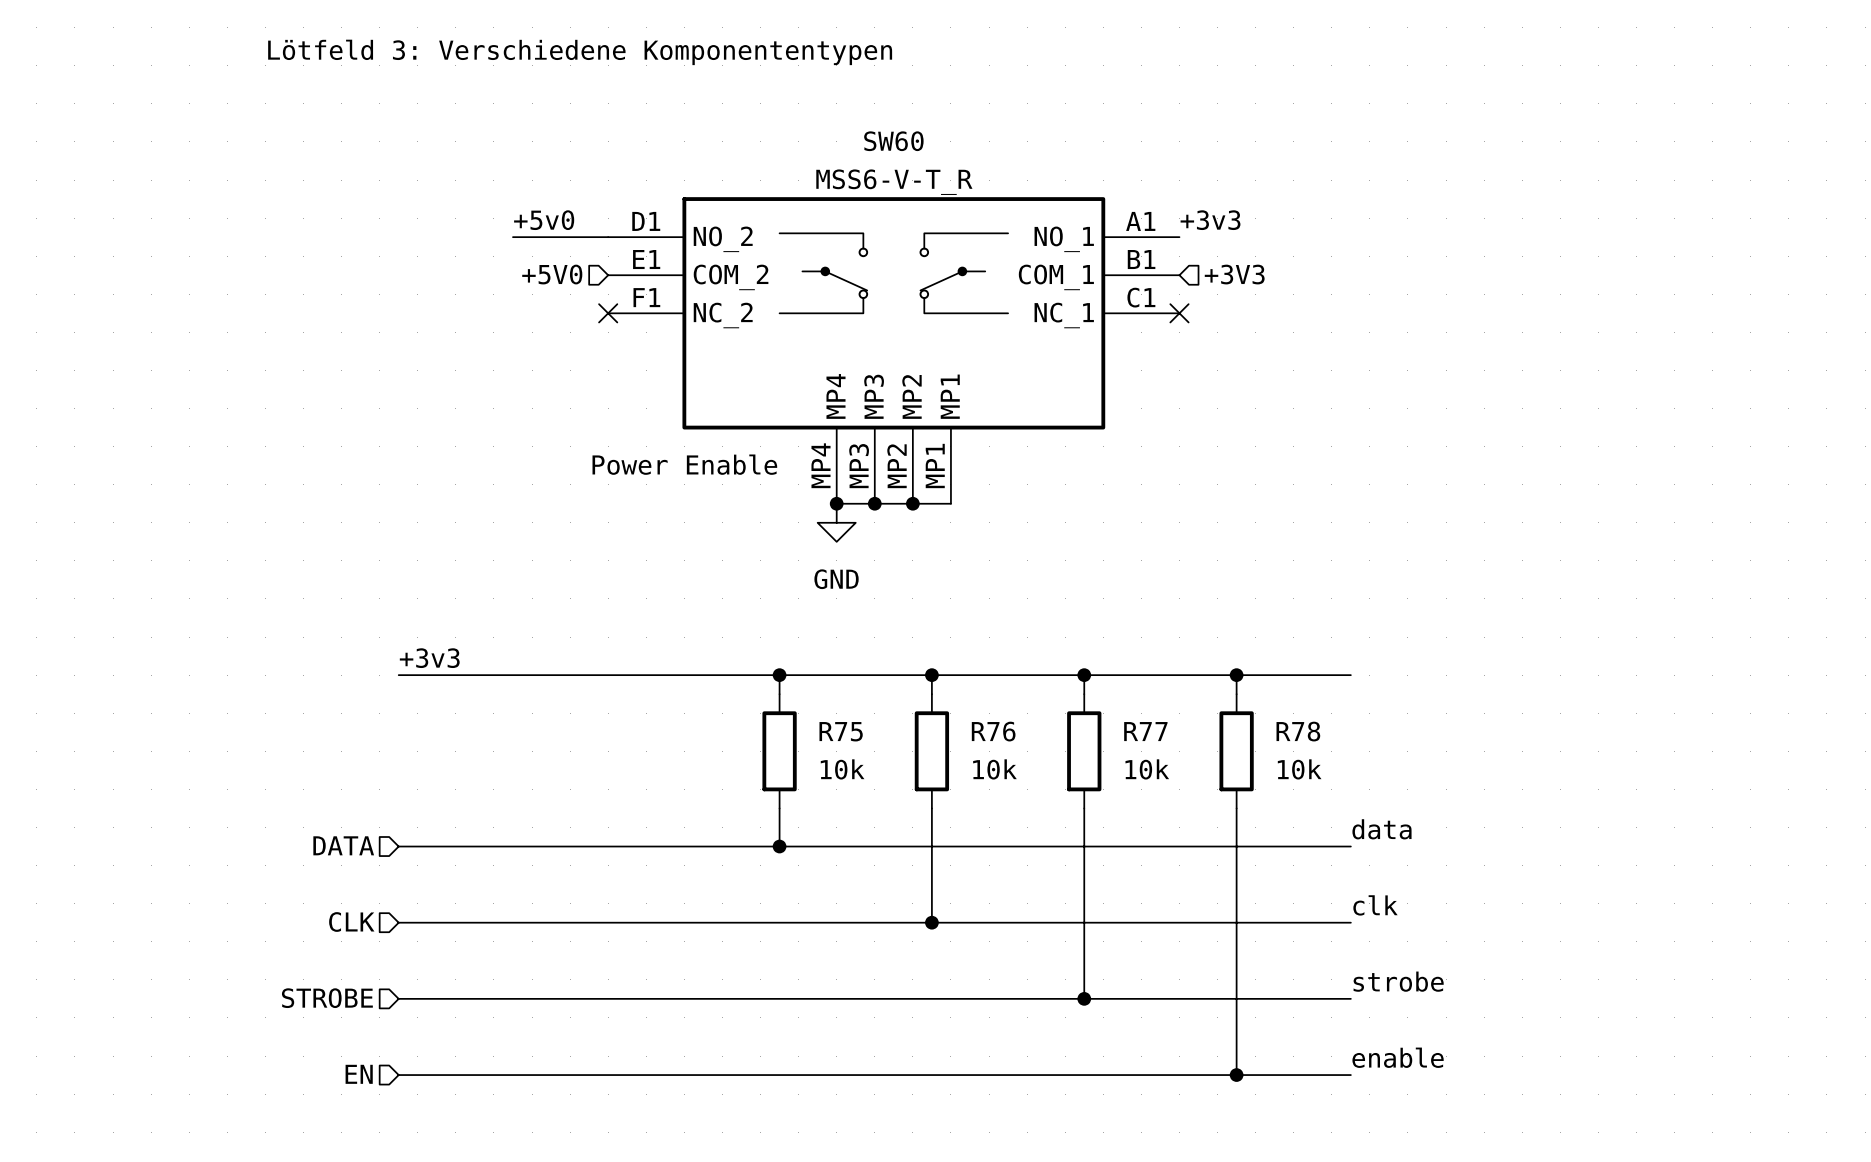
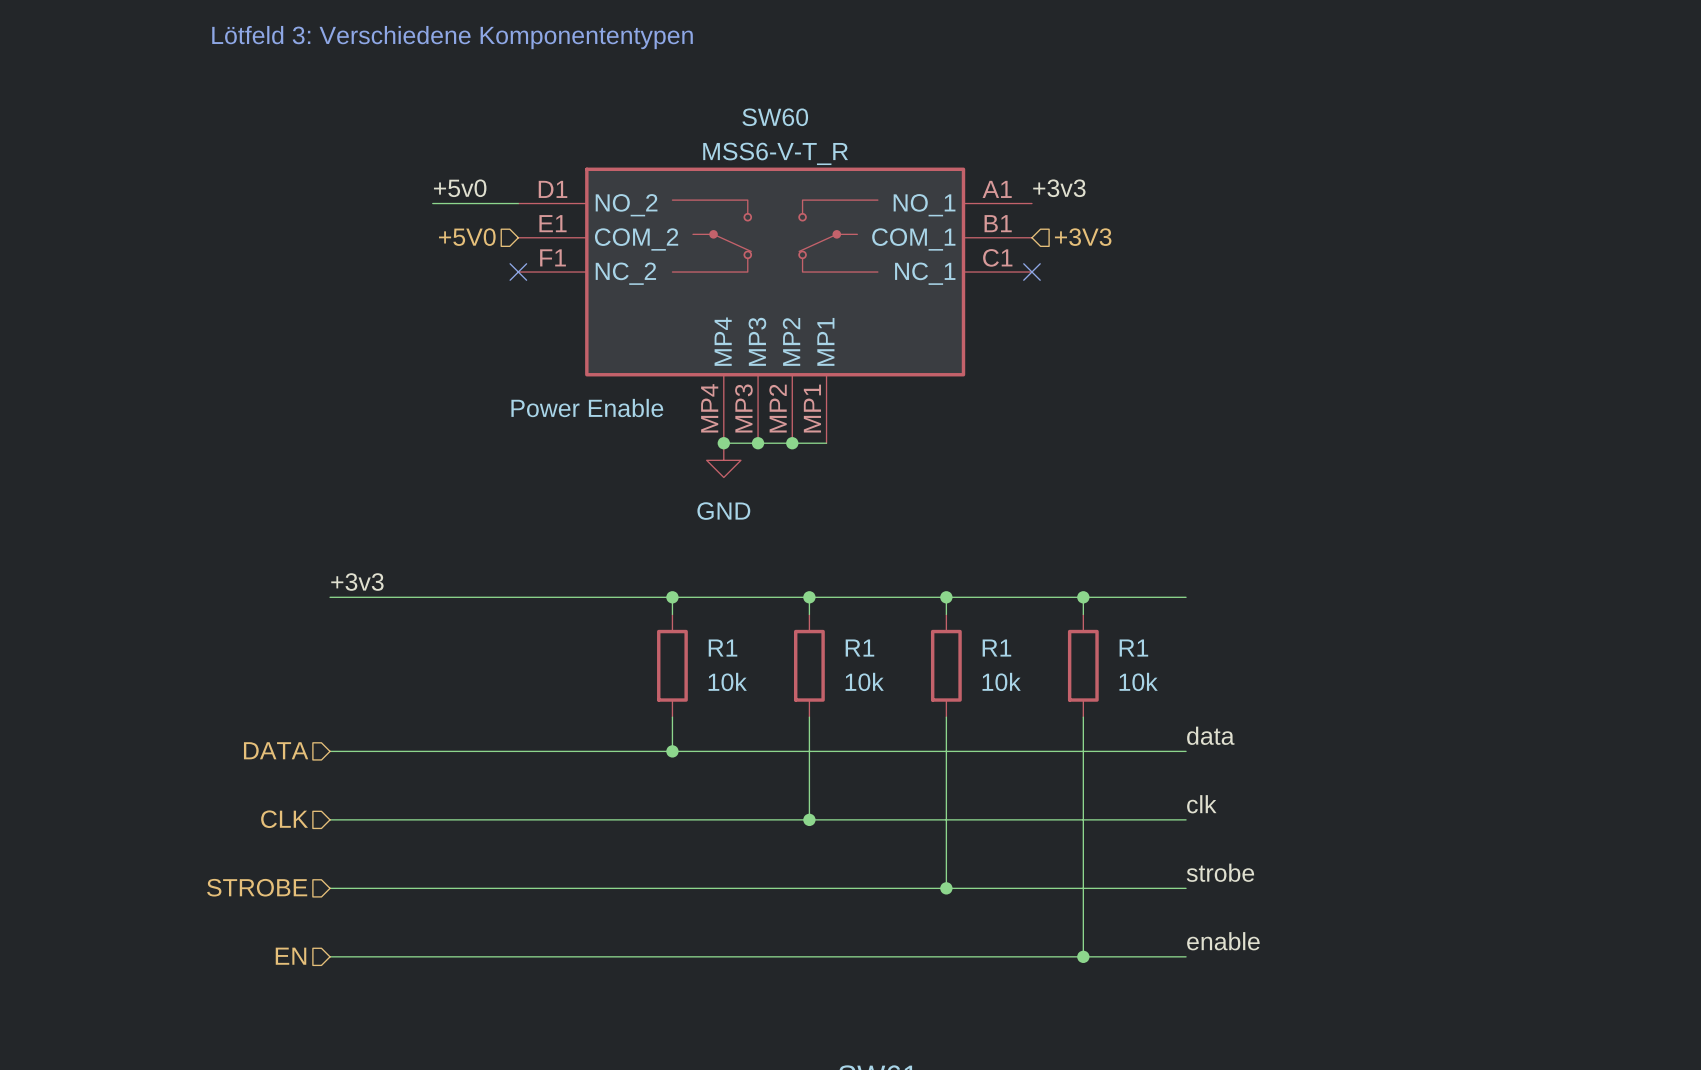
R75 name: R75 (841, 731) -> R1 (723, 648)
R76 name: R76 (993, 731) -> R1 (859, 648)
R77 name: R77 (1145, 731) -> R1 (996, 648)
R78 name: R78 (1298, 731) -> R1 (1133, 648)

